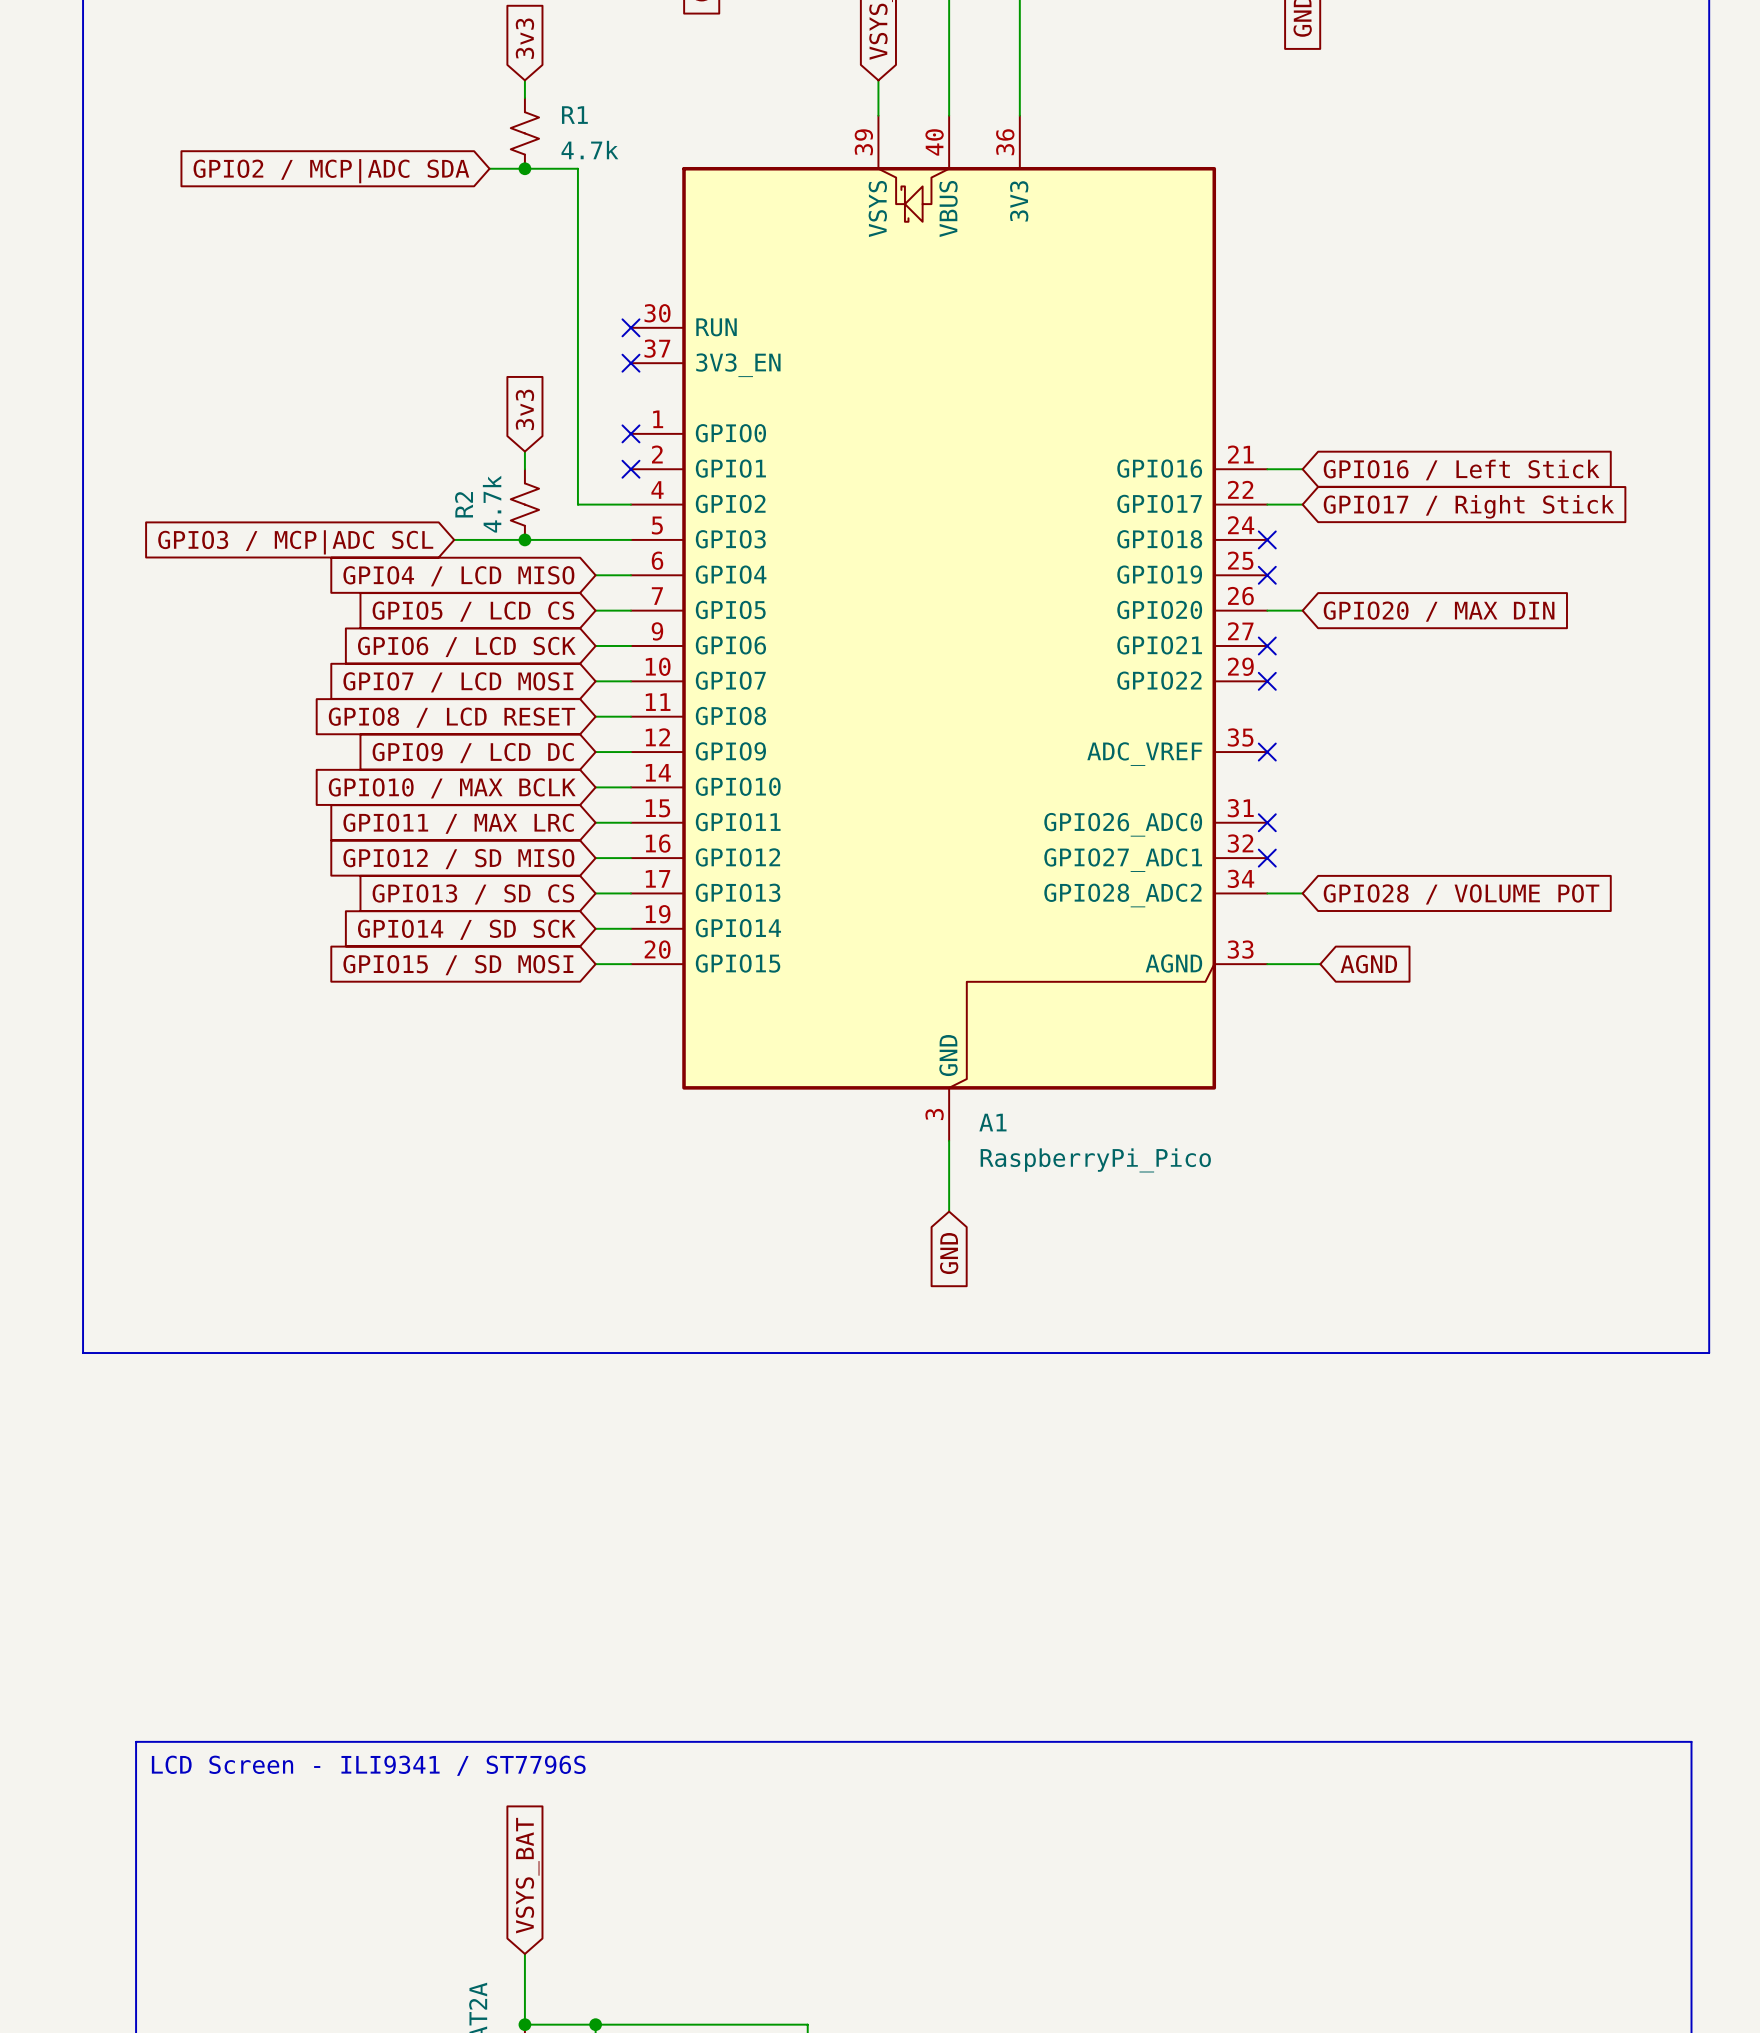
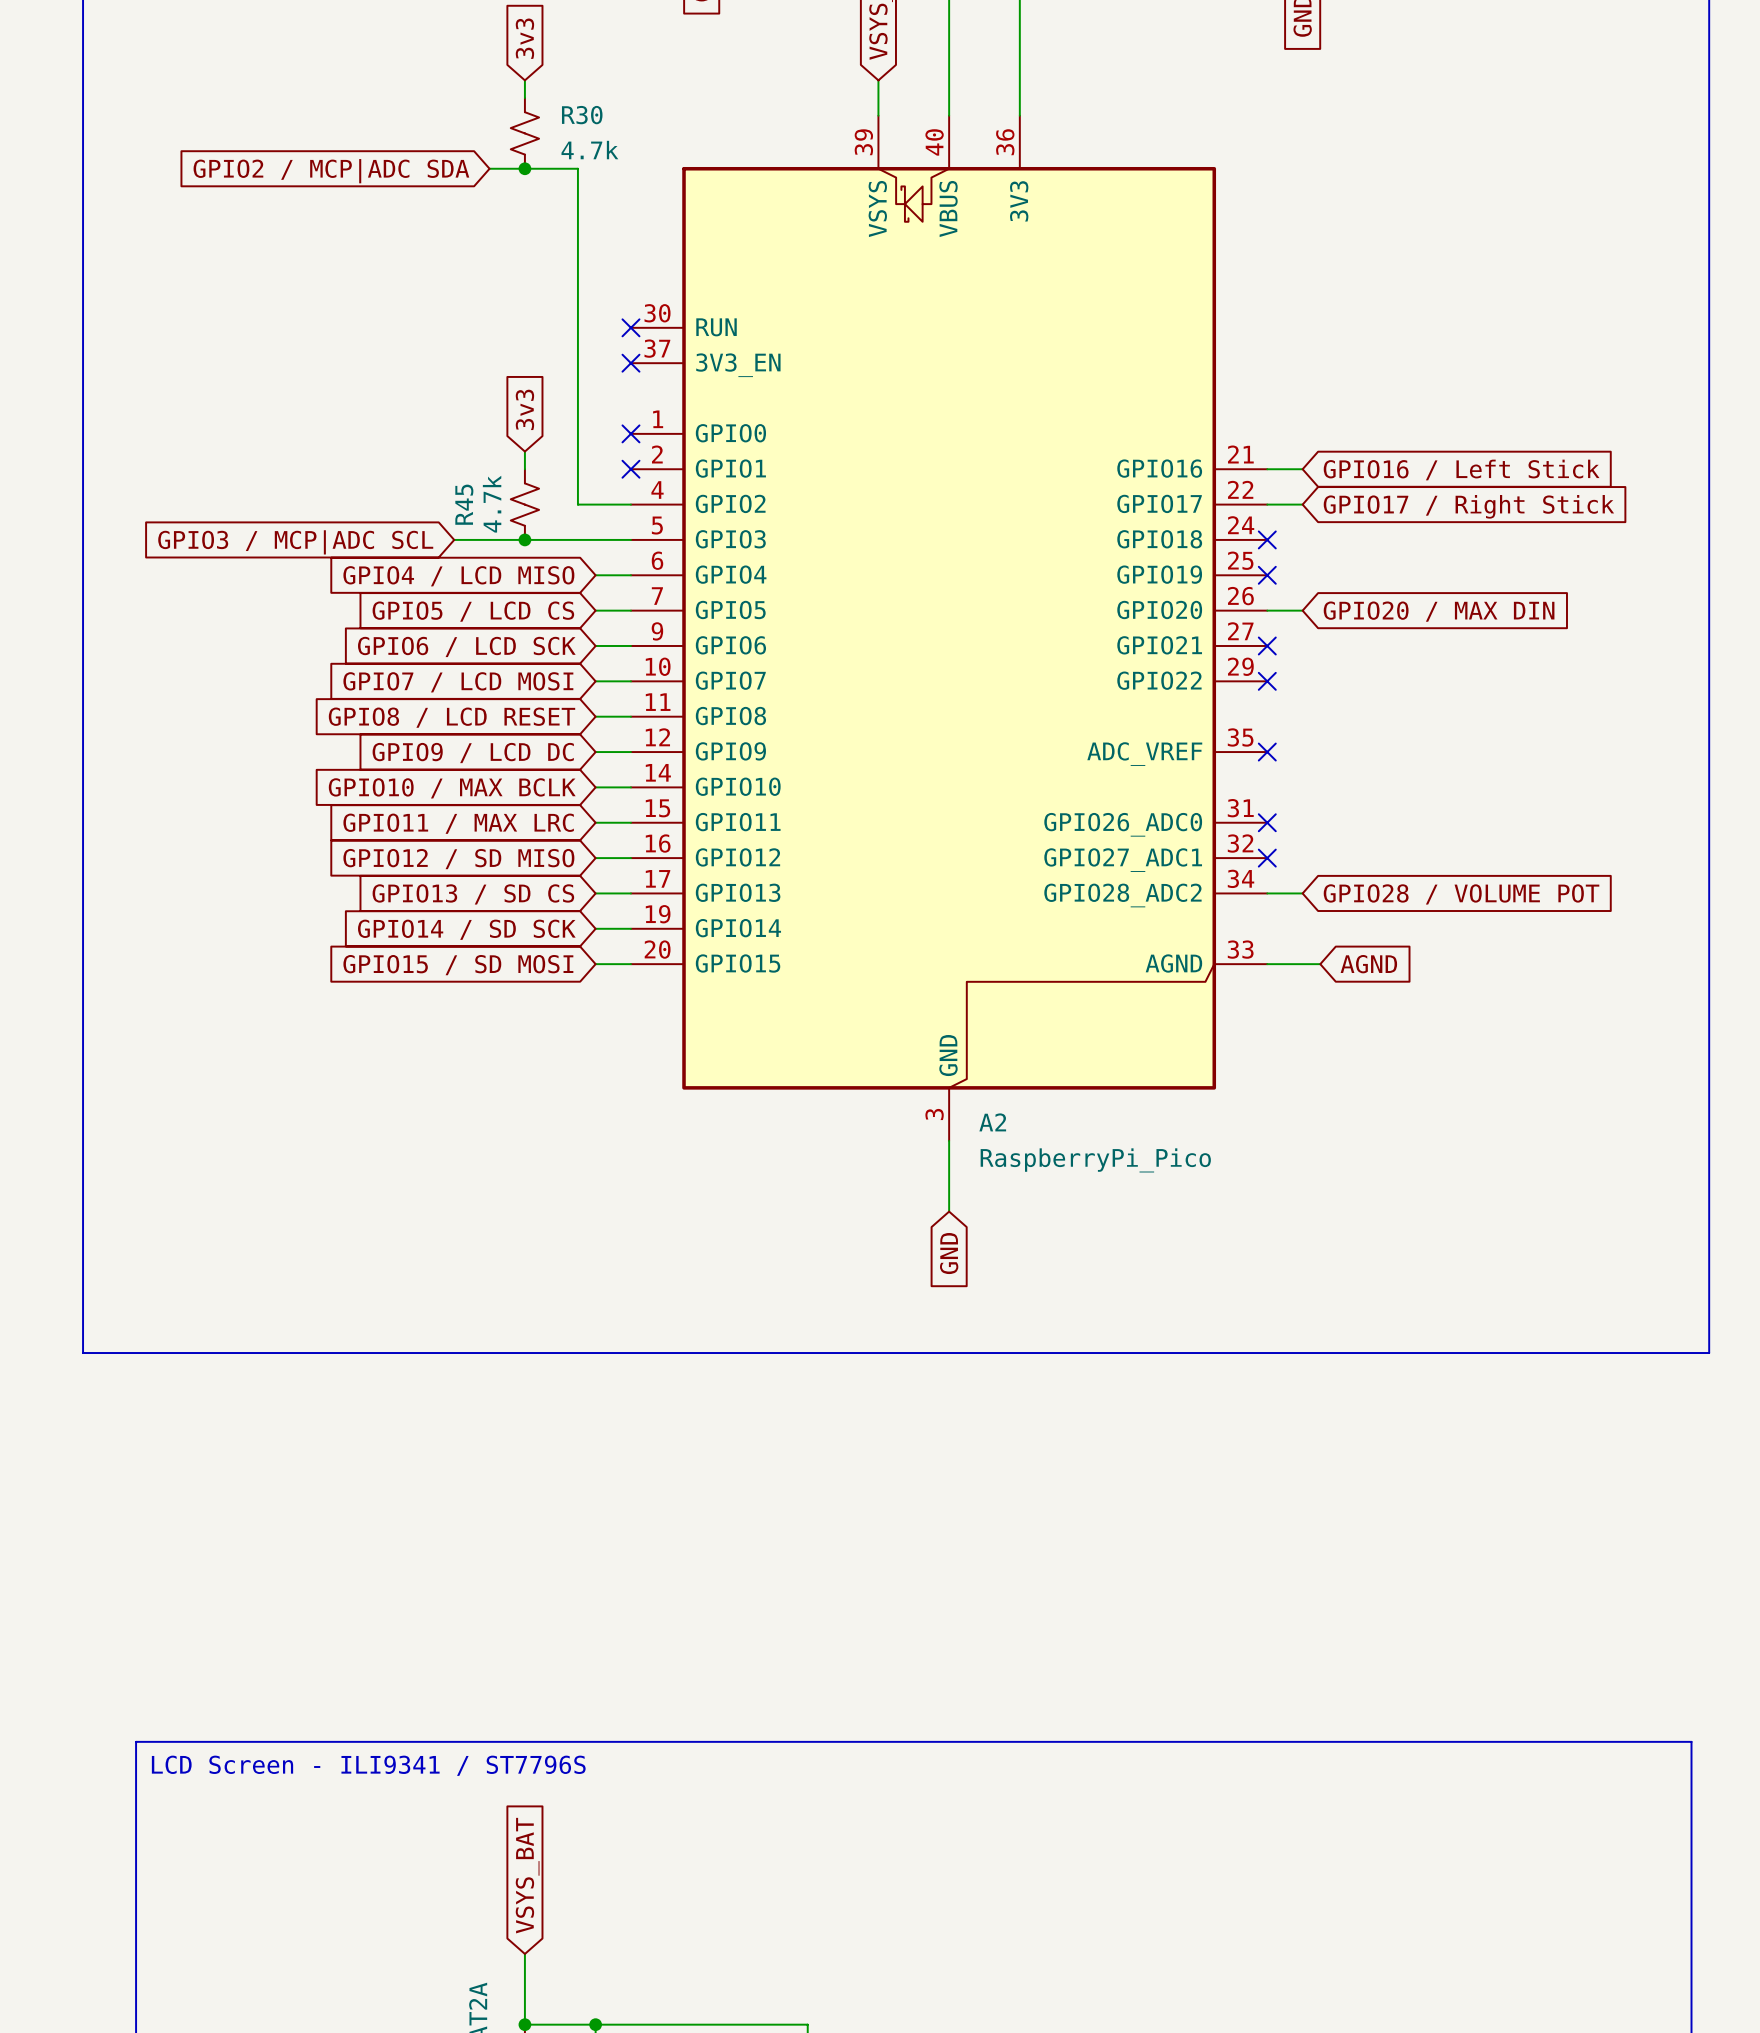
R1 name: R1 (574, 115) -> R30 (582, 115)
R2 name: R2 (464, 504) -> R45 (464, 504)
A1 name: A1 (992, 1122) -> A2 (992, 1122)

